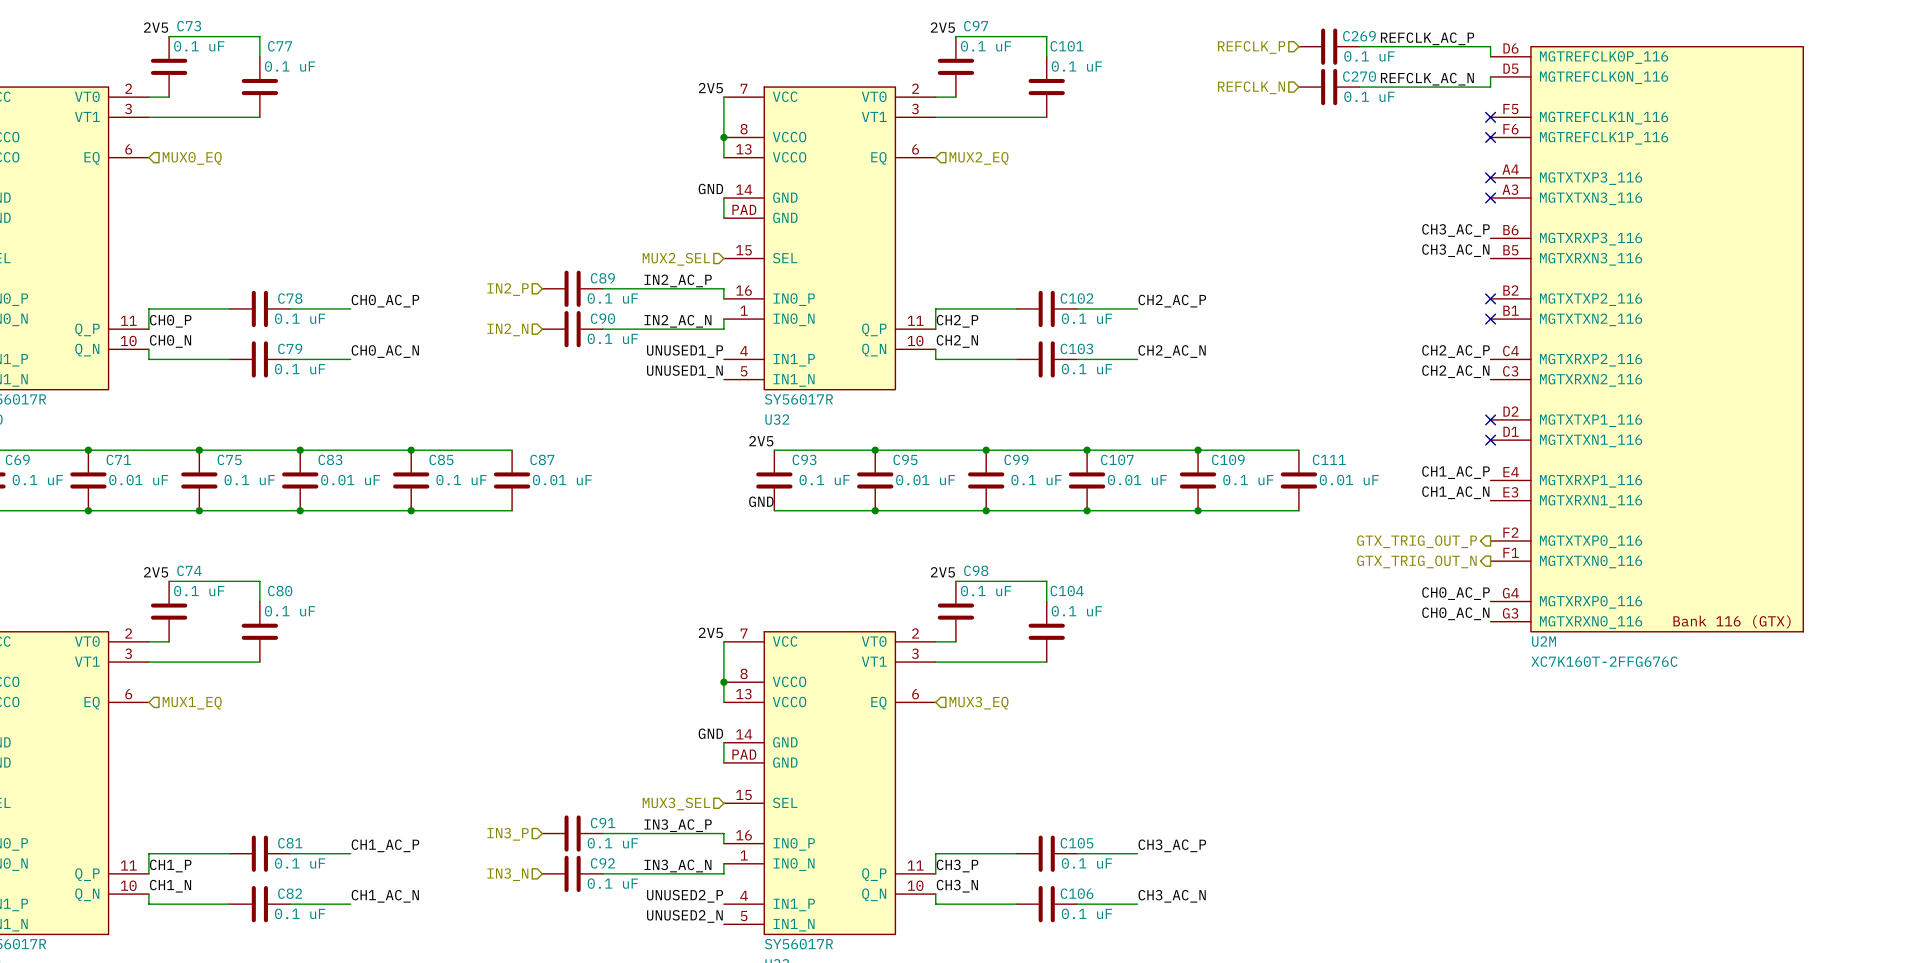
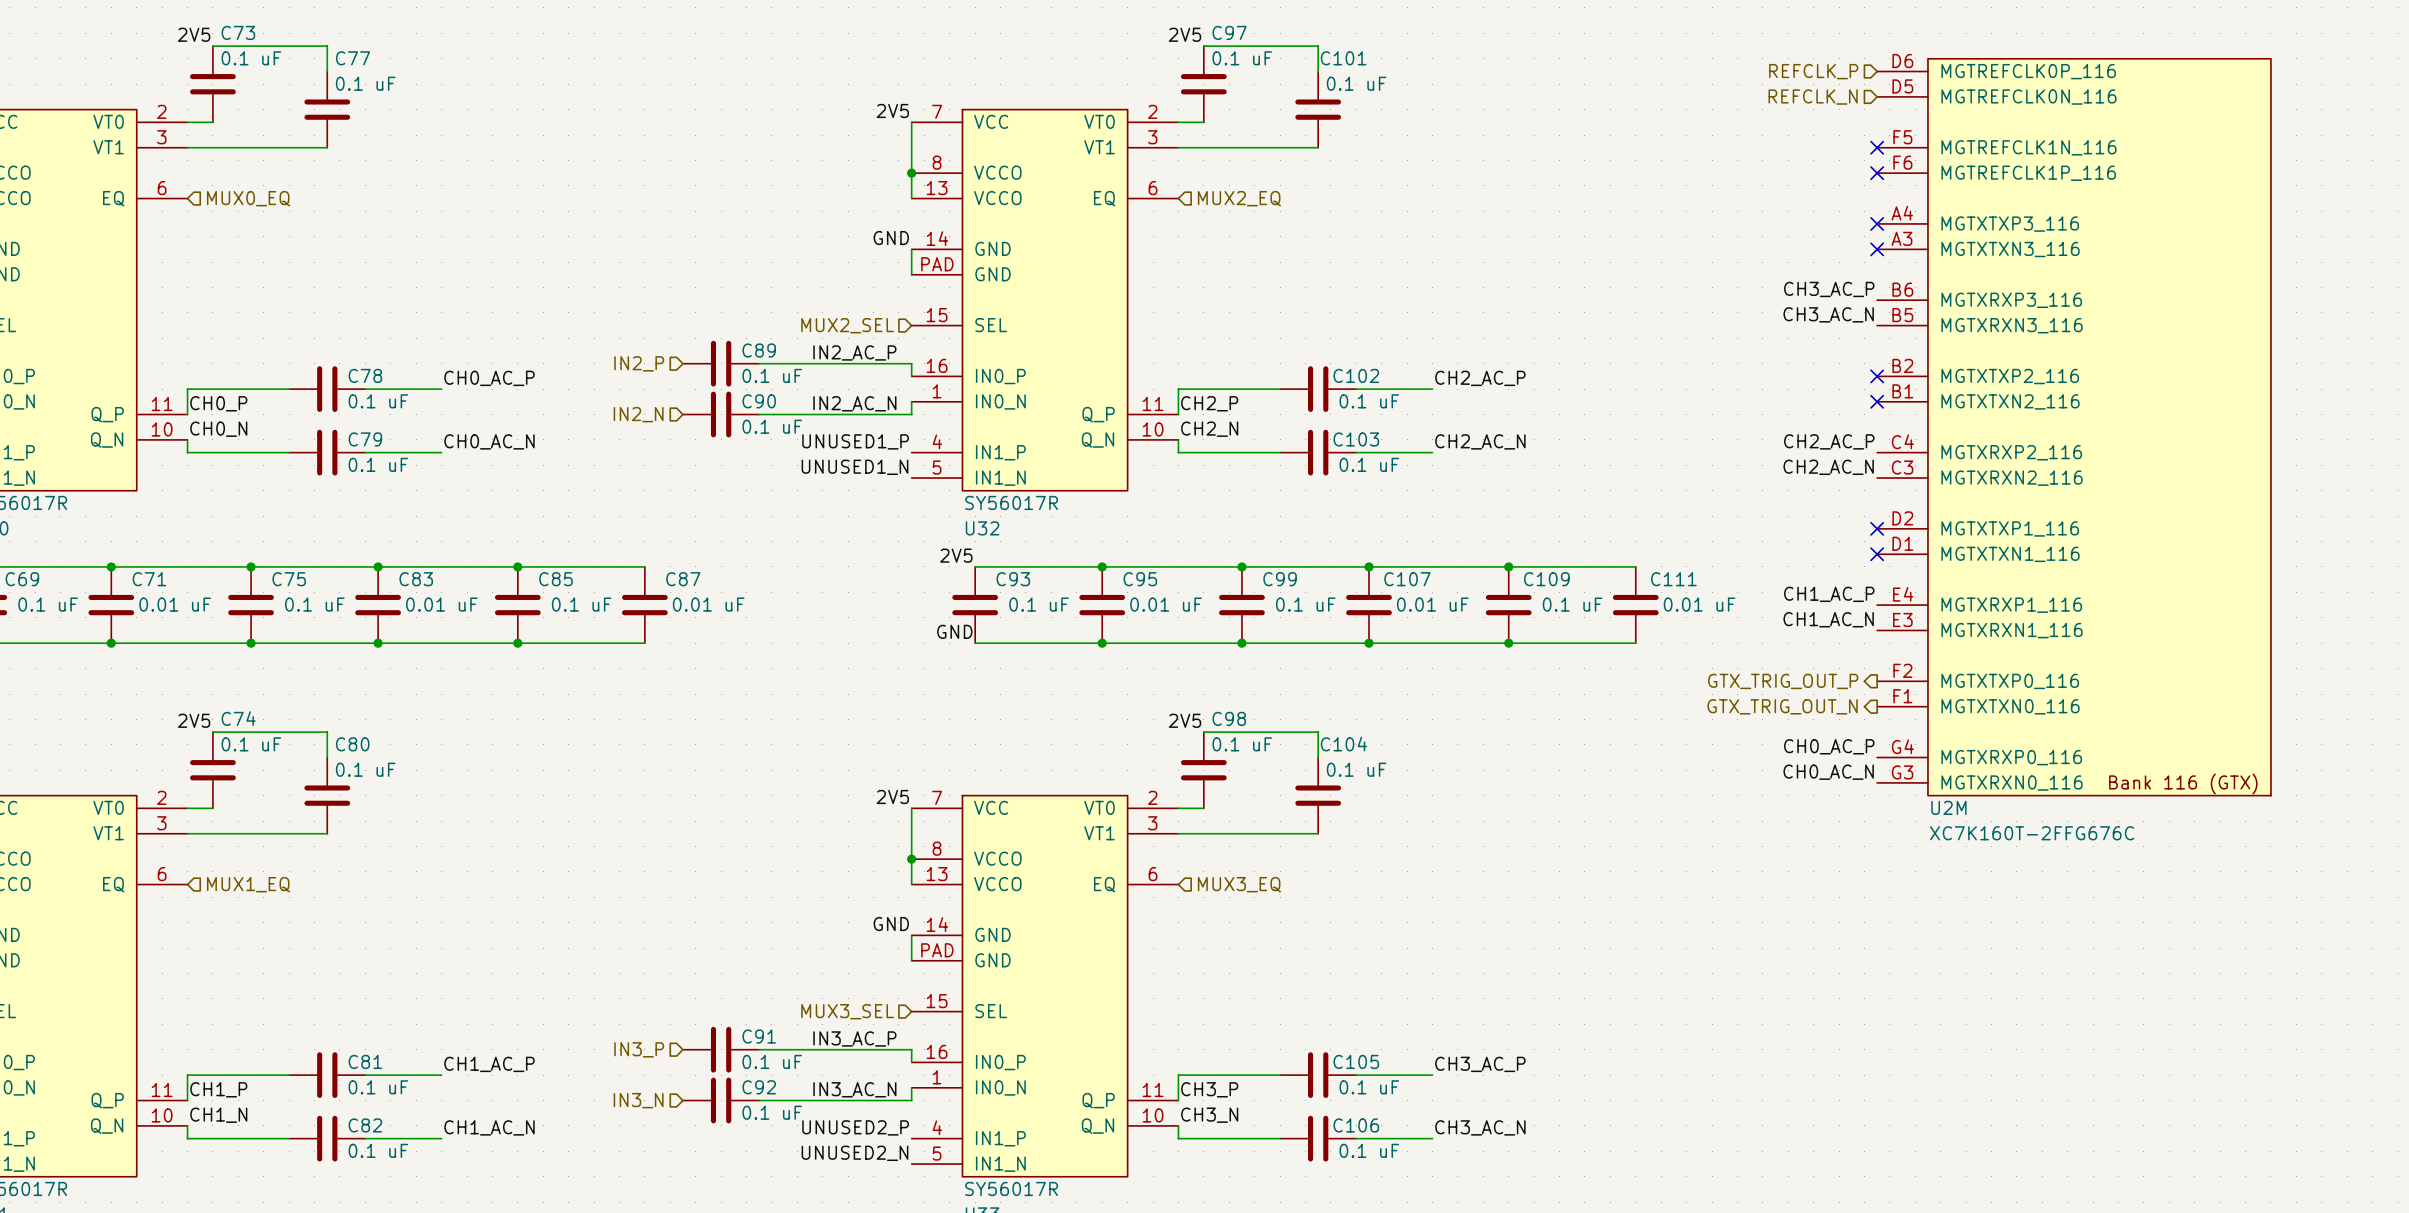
label: REFCLK_AC_P (1427, 38) -> none
C269: 0.1 uF (1329, 46) -> none
wire: (1359, 46) (1490, 46) (1490, 56) -> none
hierarchical label position: REFCLK_P (1251, 47) -> REFCLK_P (1813, 71)
wire: (1490, 76) (1490, 87) (1359, 87) -> none
label: REFCLK_AC_N (1427, 79) -> none
hierarchical label position: REFCLK_N (1251, 87) -> REFCLK_N (1813, 97)
C270: 0.1 uF (1329, 87) -> none

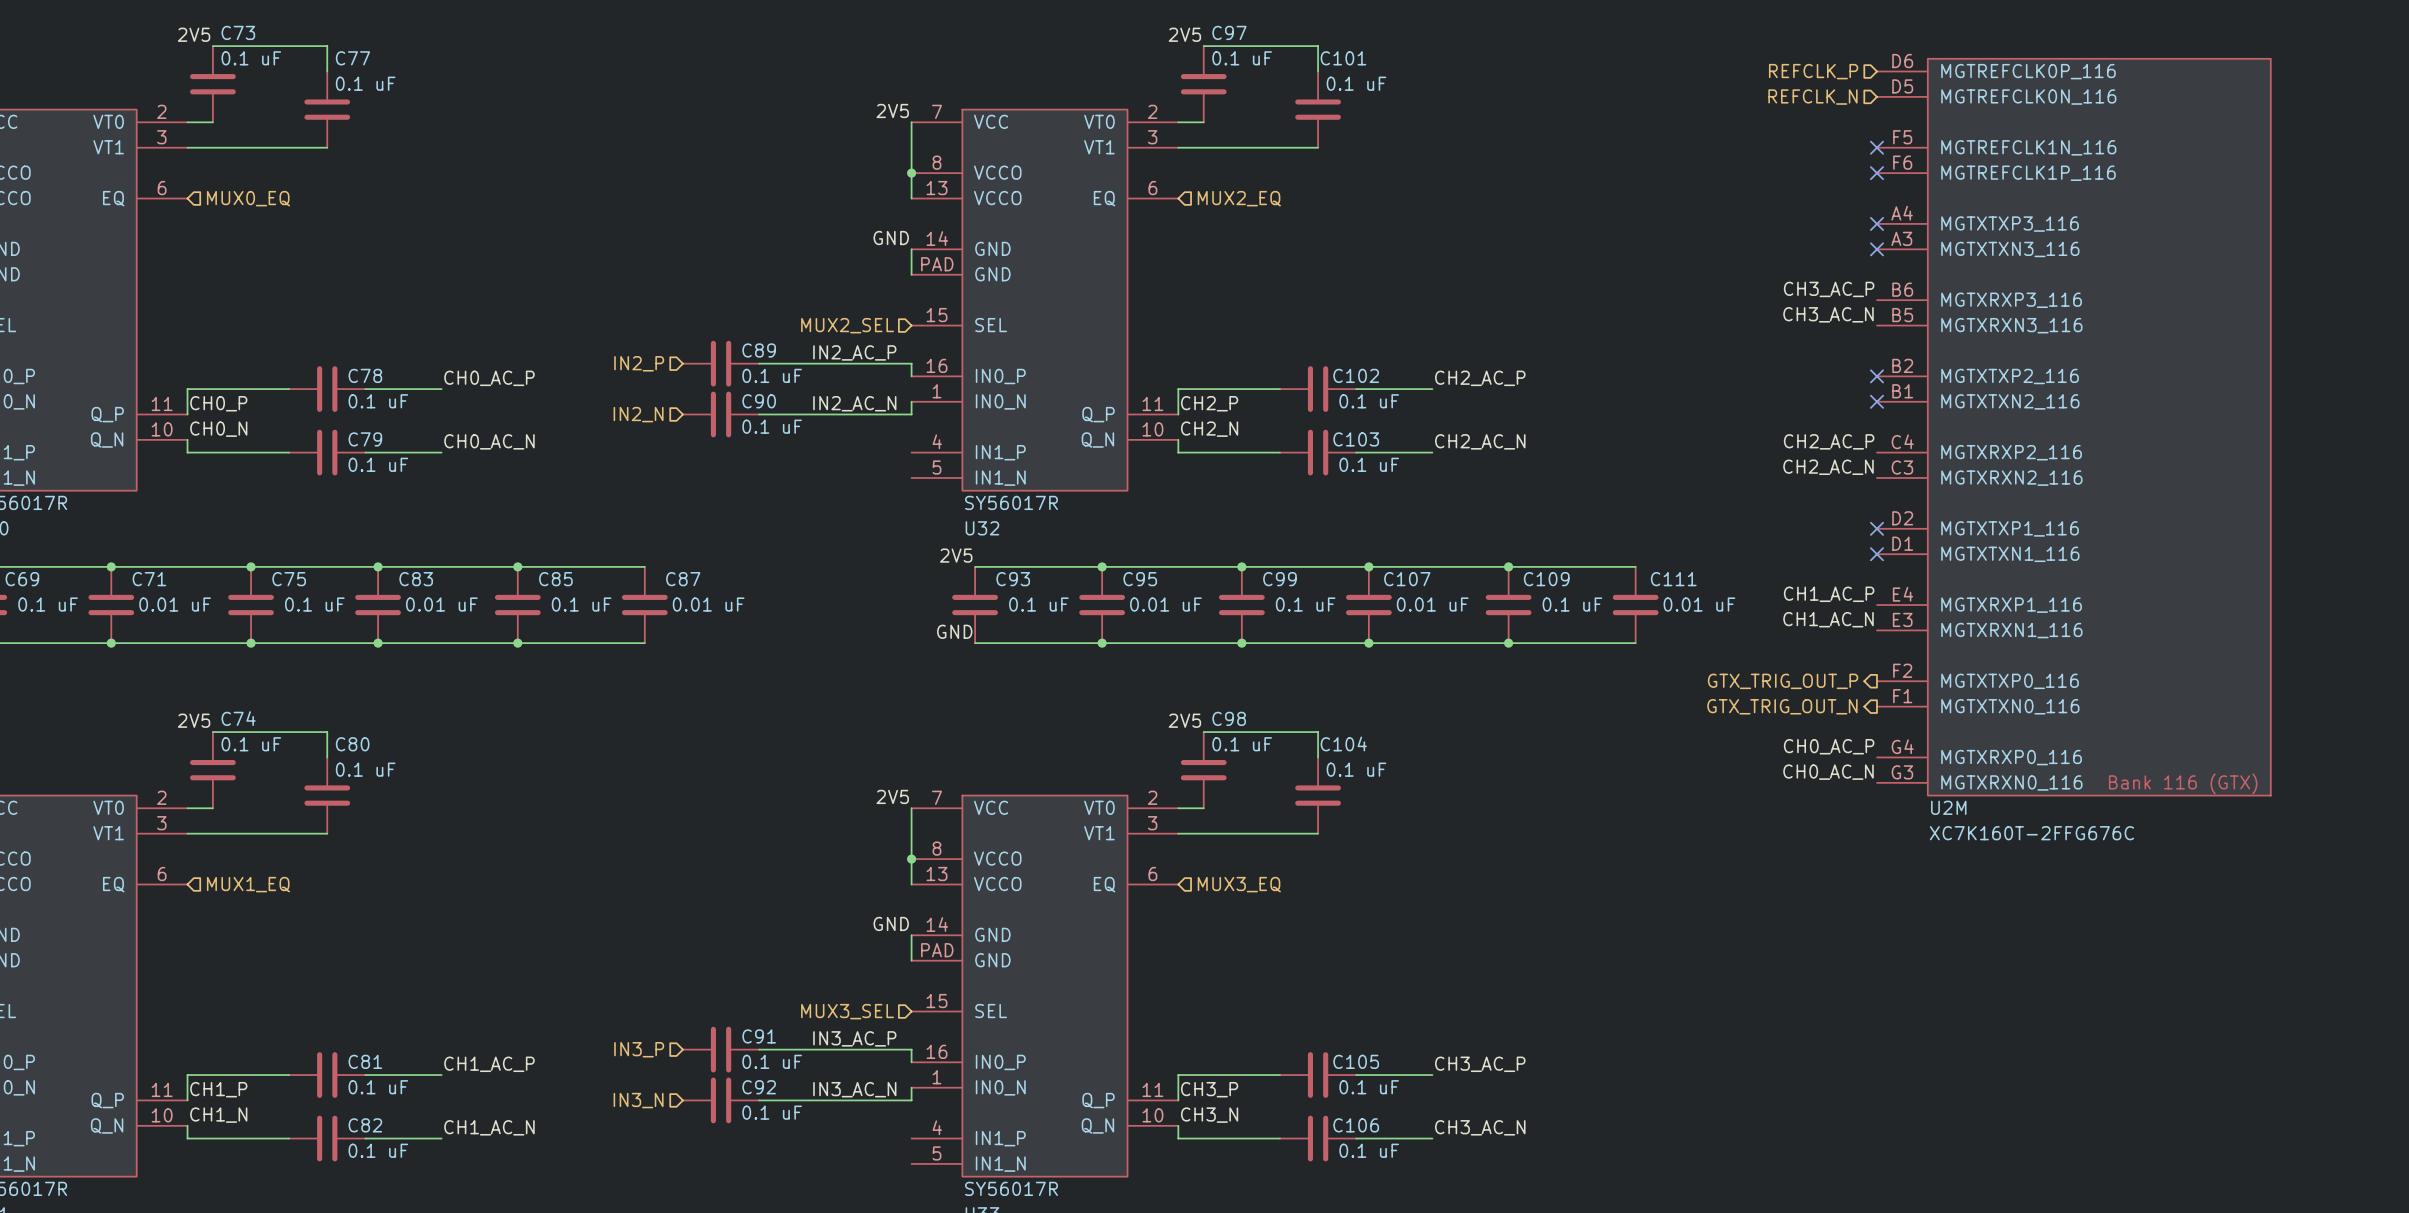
label: UNUSED1_P (855, 441) -> none
label: UNUSED1_N (854, 467) -> none
label: UNUSED2_P (855, 1127) -> none
label: UNUSED2_N (854, 1153) -> none

